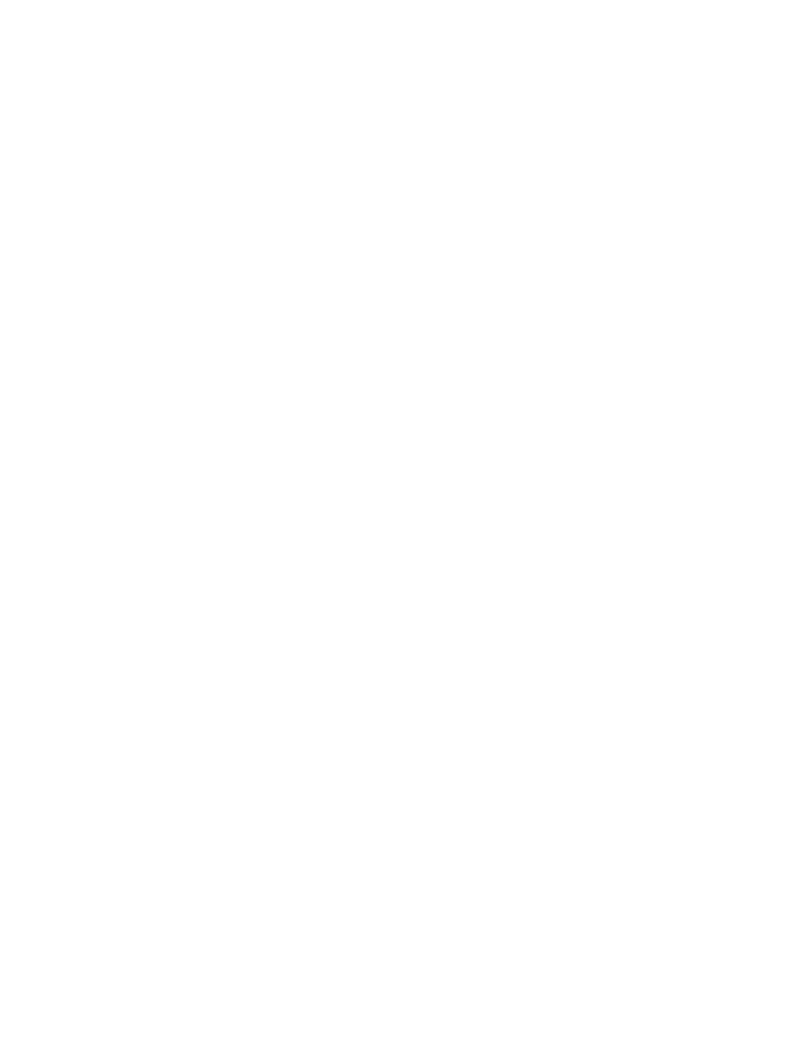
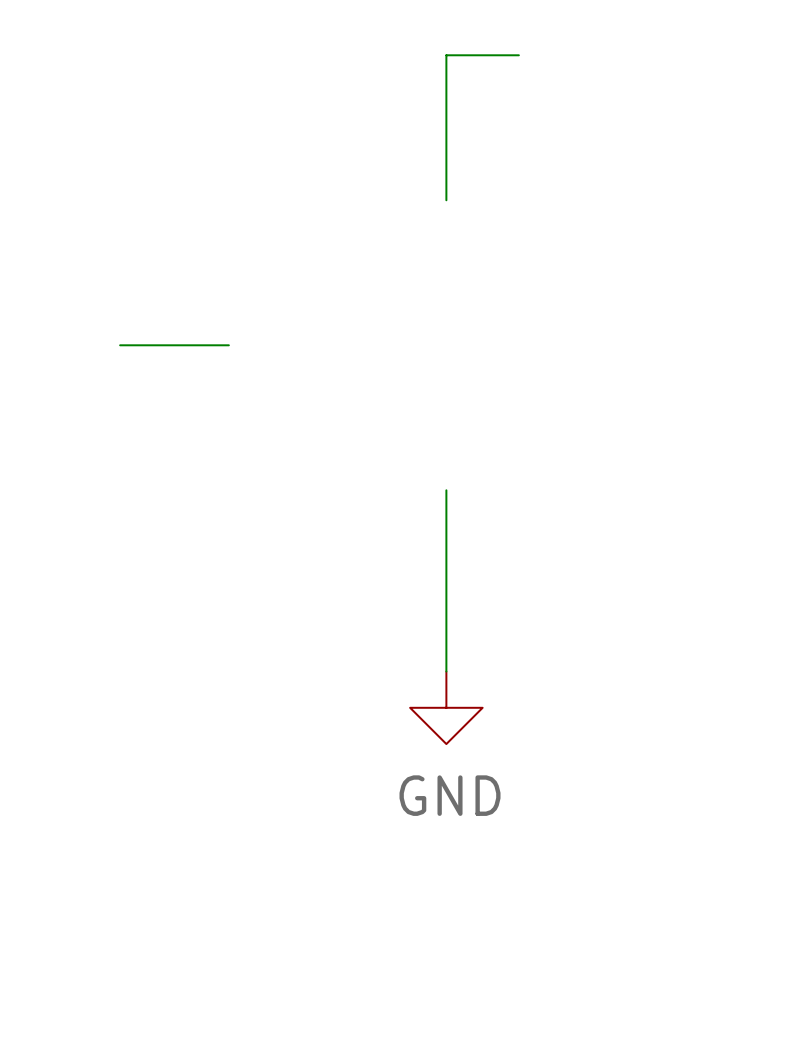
wire: none -> (518, 55) (446, 55) (446, 200)
wire: none -> (120, 345) (228, 345)
wire: none -> (446, 490) (446, 671)
power symbol: none -> GND (446, 707)

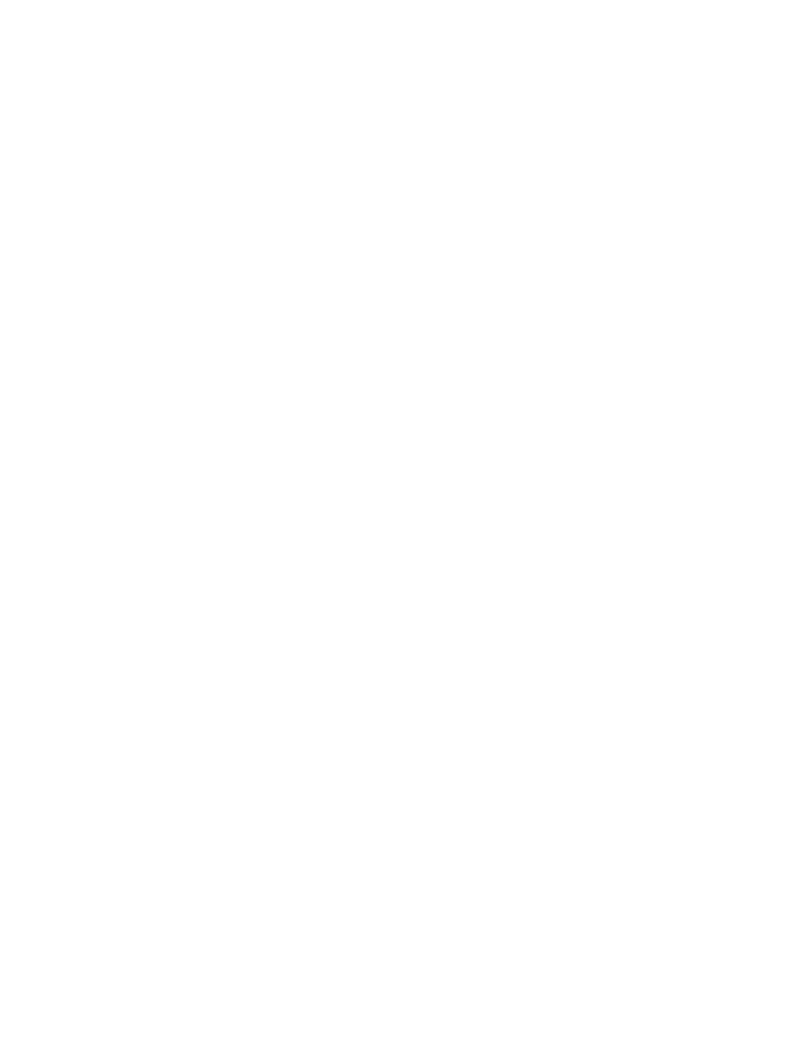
wire: (518, 55) (446, 55) (446, 200) -> none
wire: (120, 345) (228, 345) -> none
wire: (446, 490) (446, 671) -> none
power symbol: GND (446, 707) -> none

